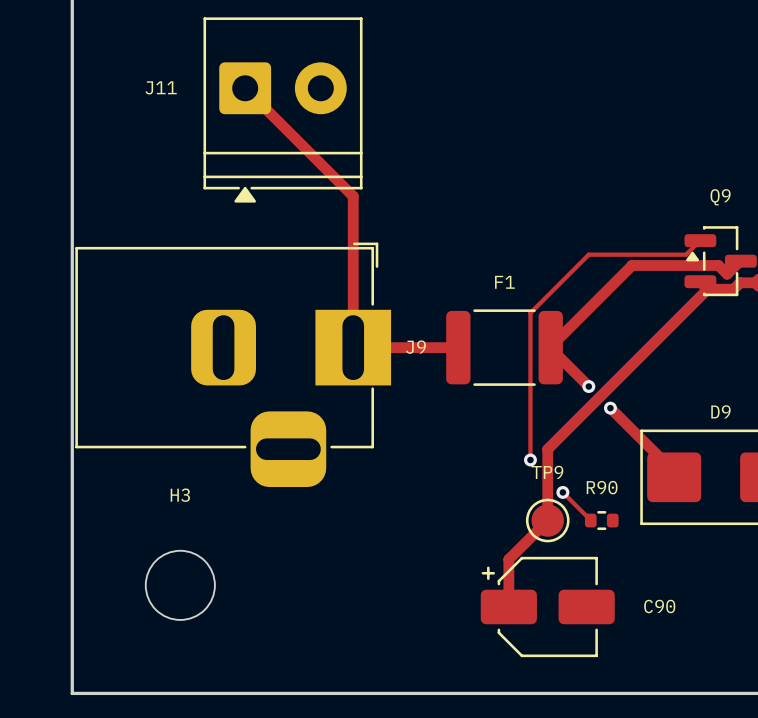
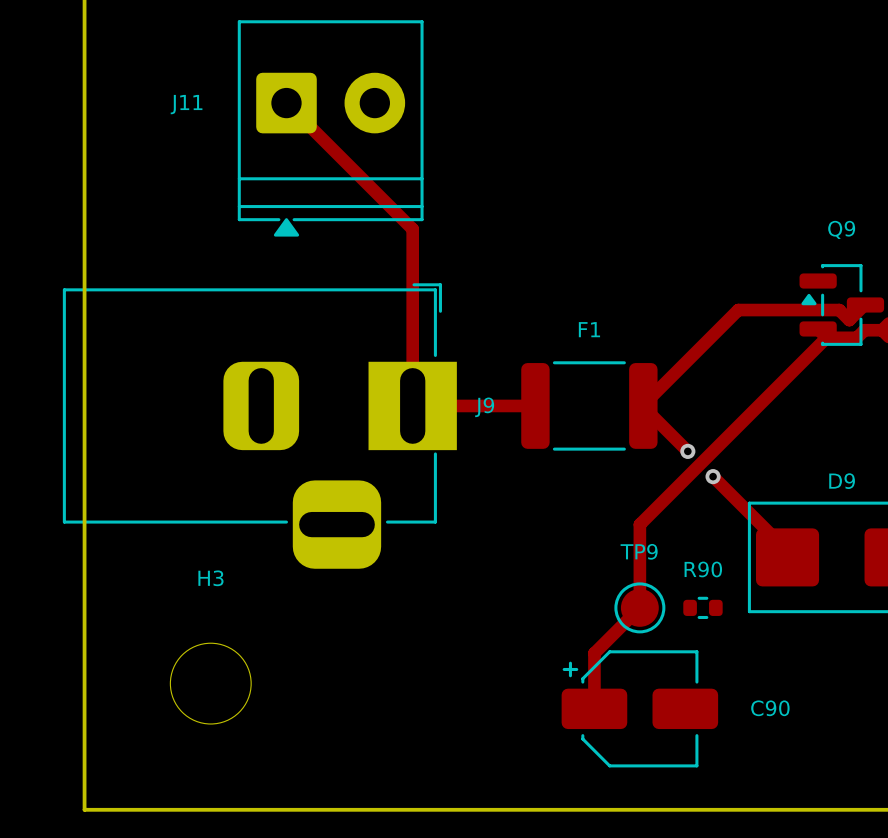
top track: (700, 240) (686, 254) (588, 254) (530, 313) (530, 460) -> none
J9 footprint: [75, 242, 392, 488] -> [62, 283, 457, 569]
via: (530, 460) -> none
top track: (562, 492) (590, 520) -> none
via: (562, 492) -> none

